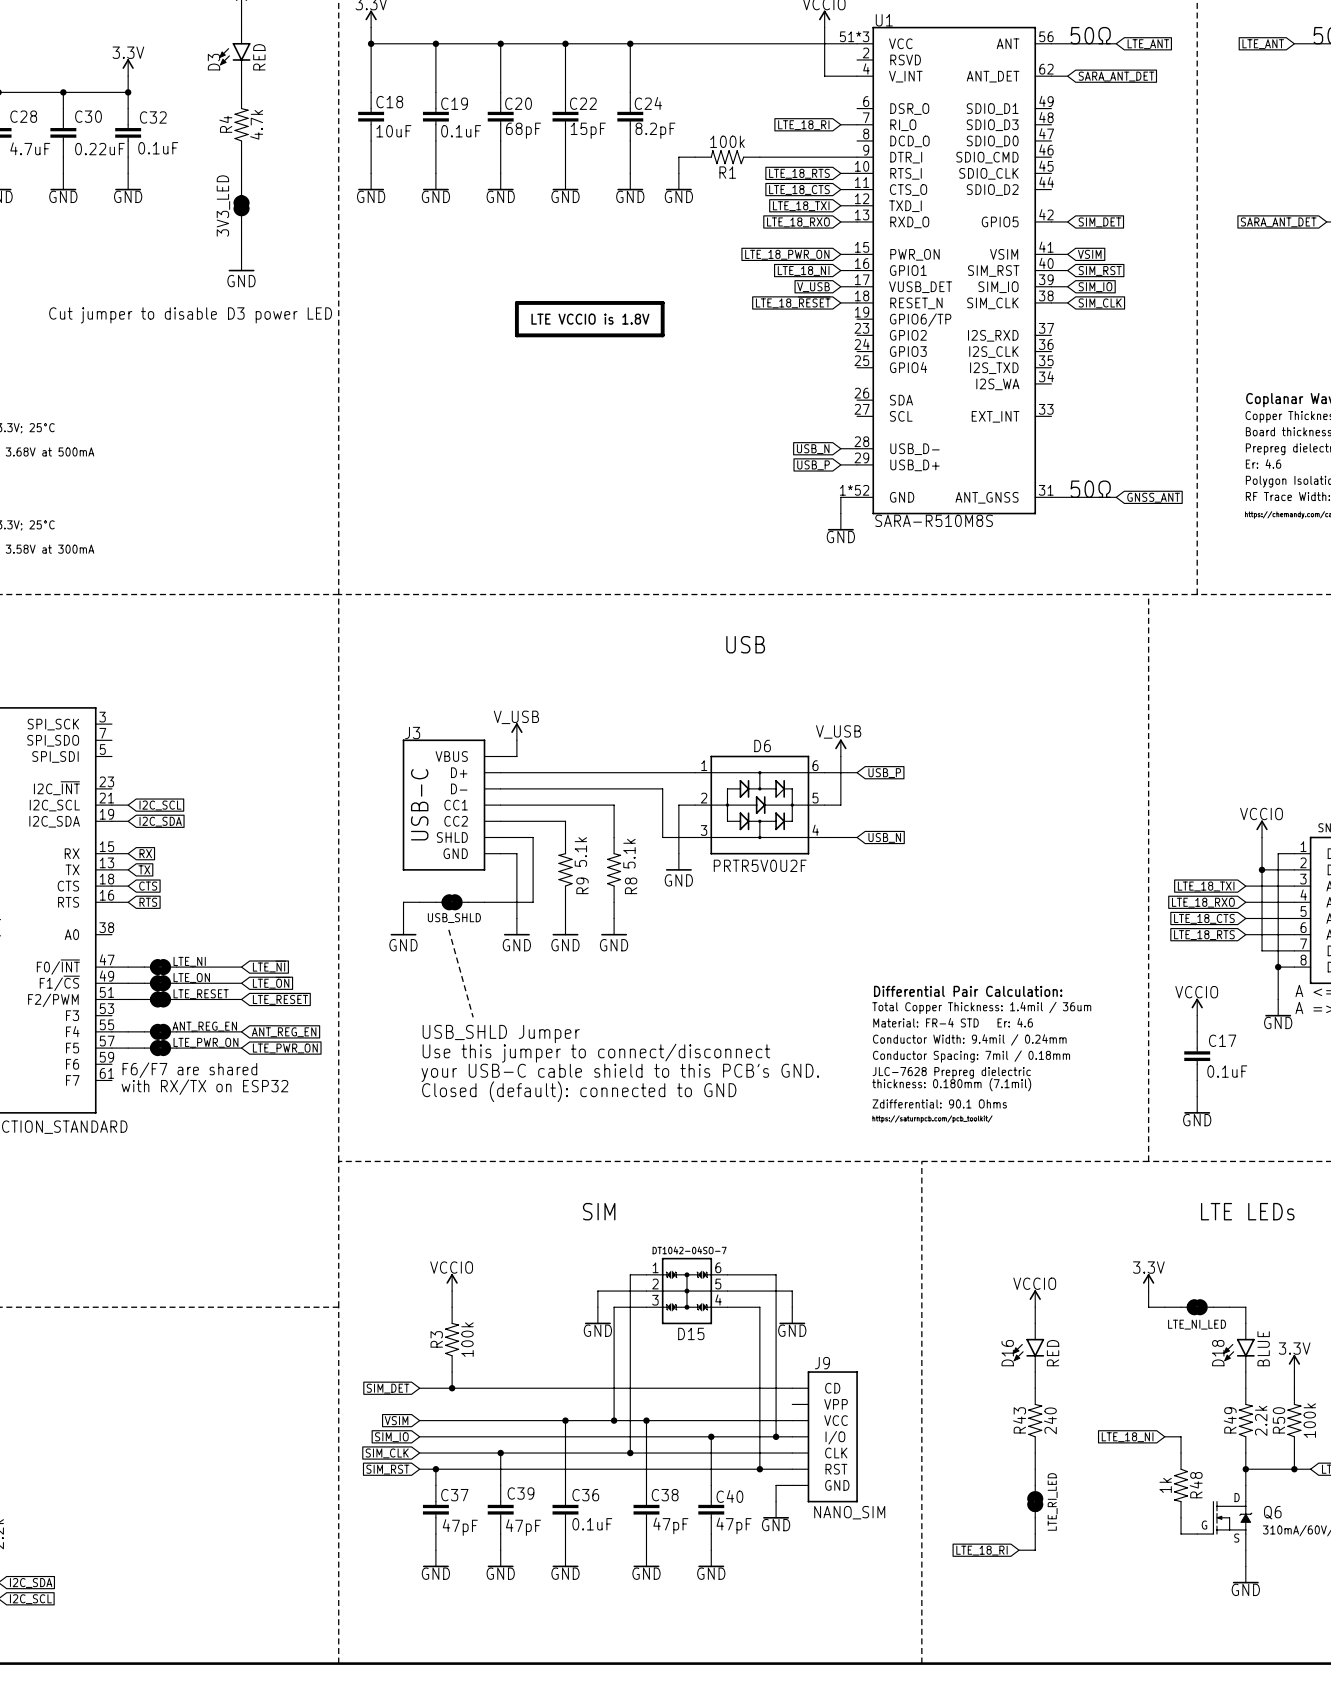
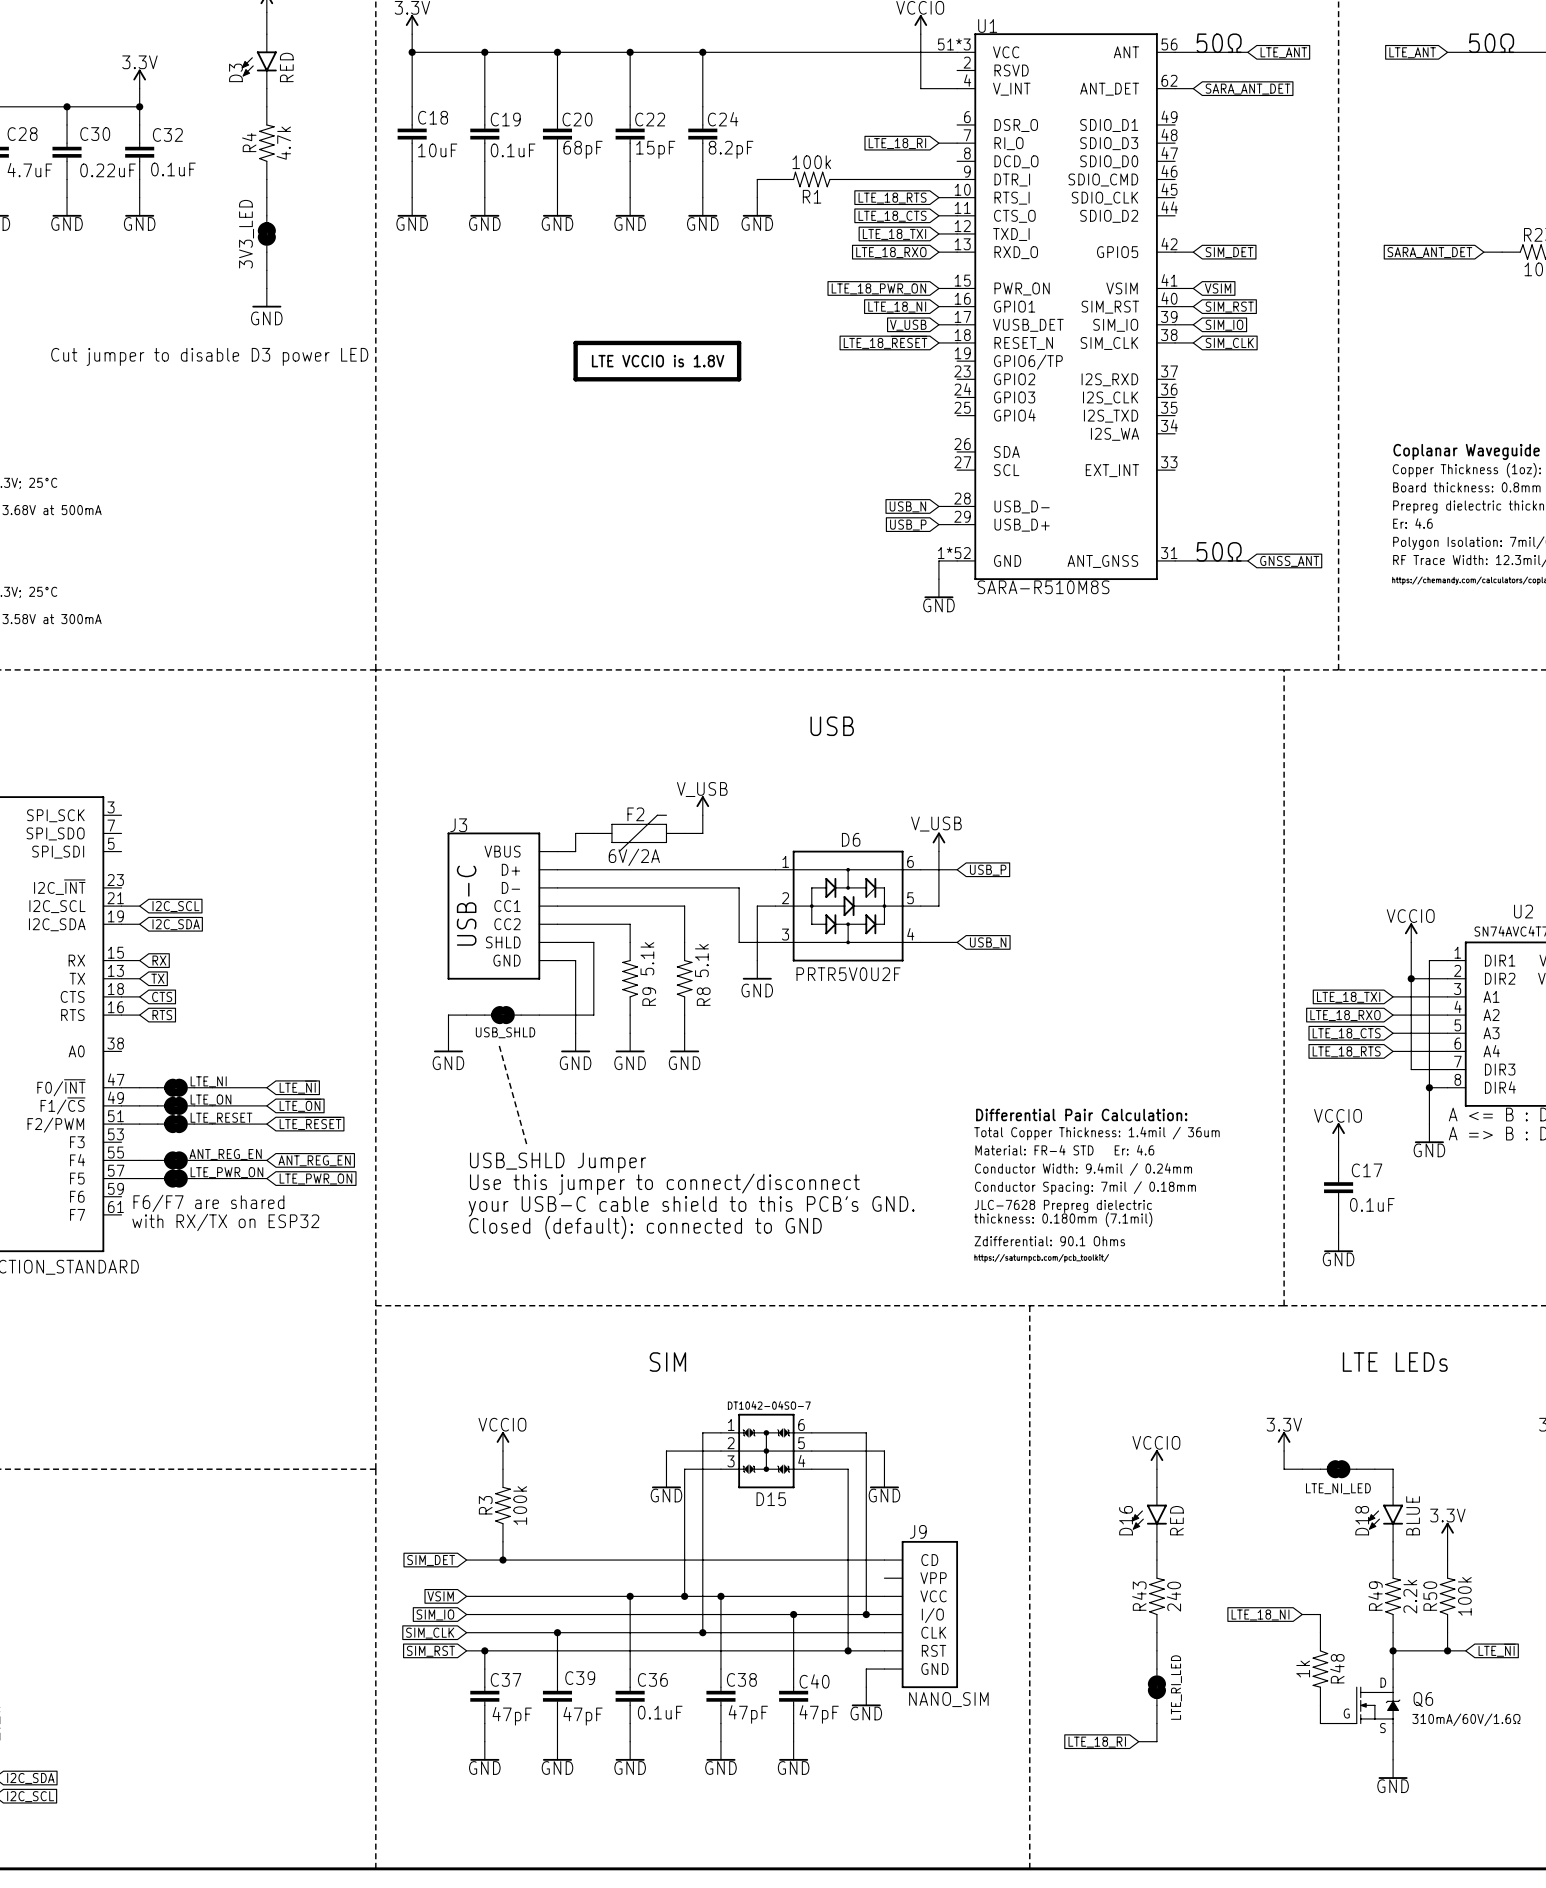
wire: none -> (702, 815) (702, 833) (684, 833)
power symbol position: V_USB (516, 731) -> V_USB (702, 805)
wire: none -> (575, 833) (593, 833)
F2: none -> 6V/2A (639, 833)

